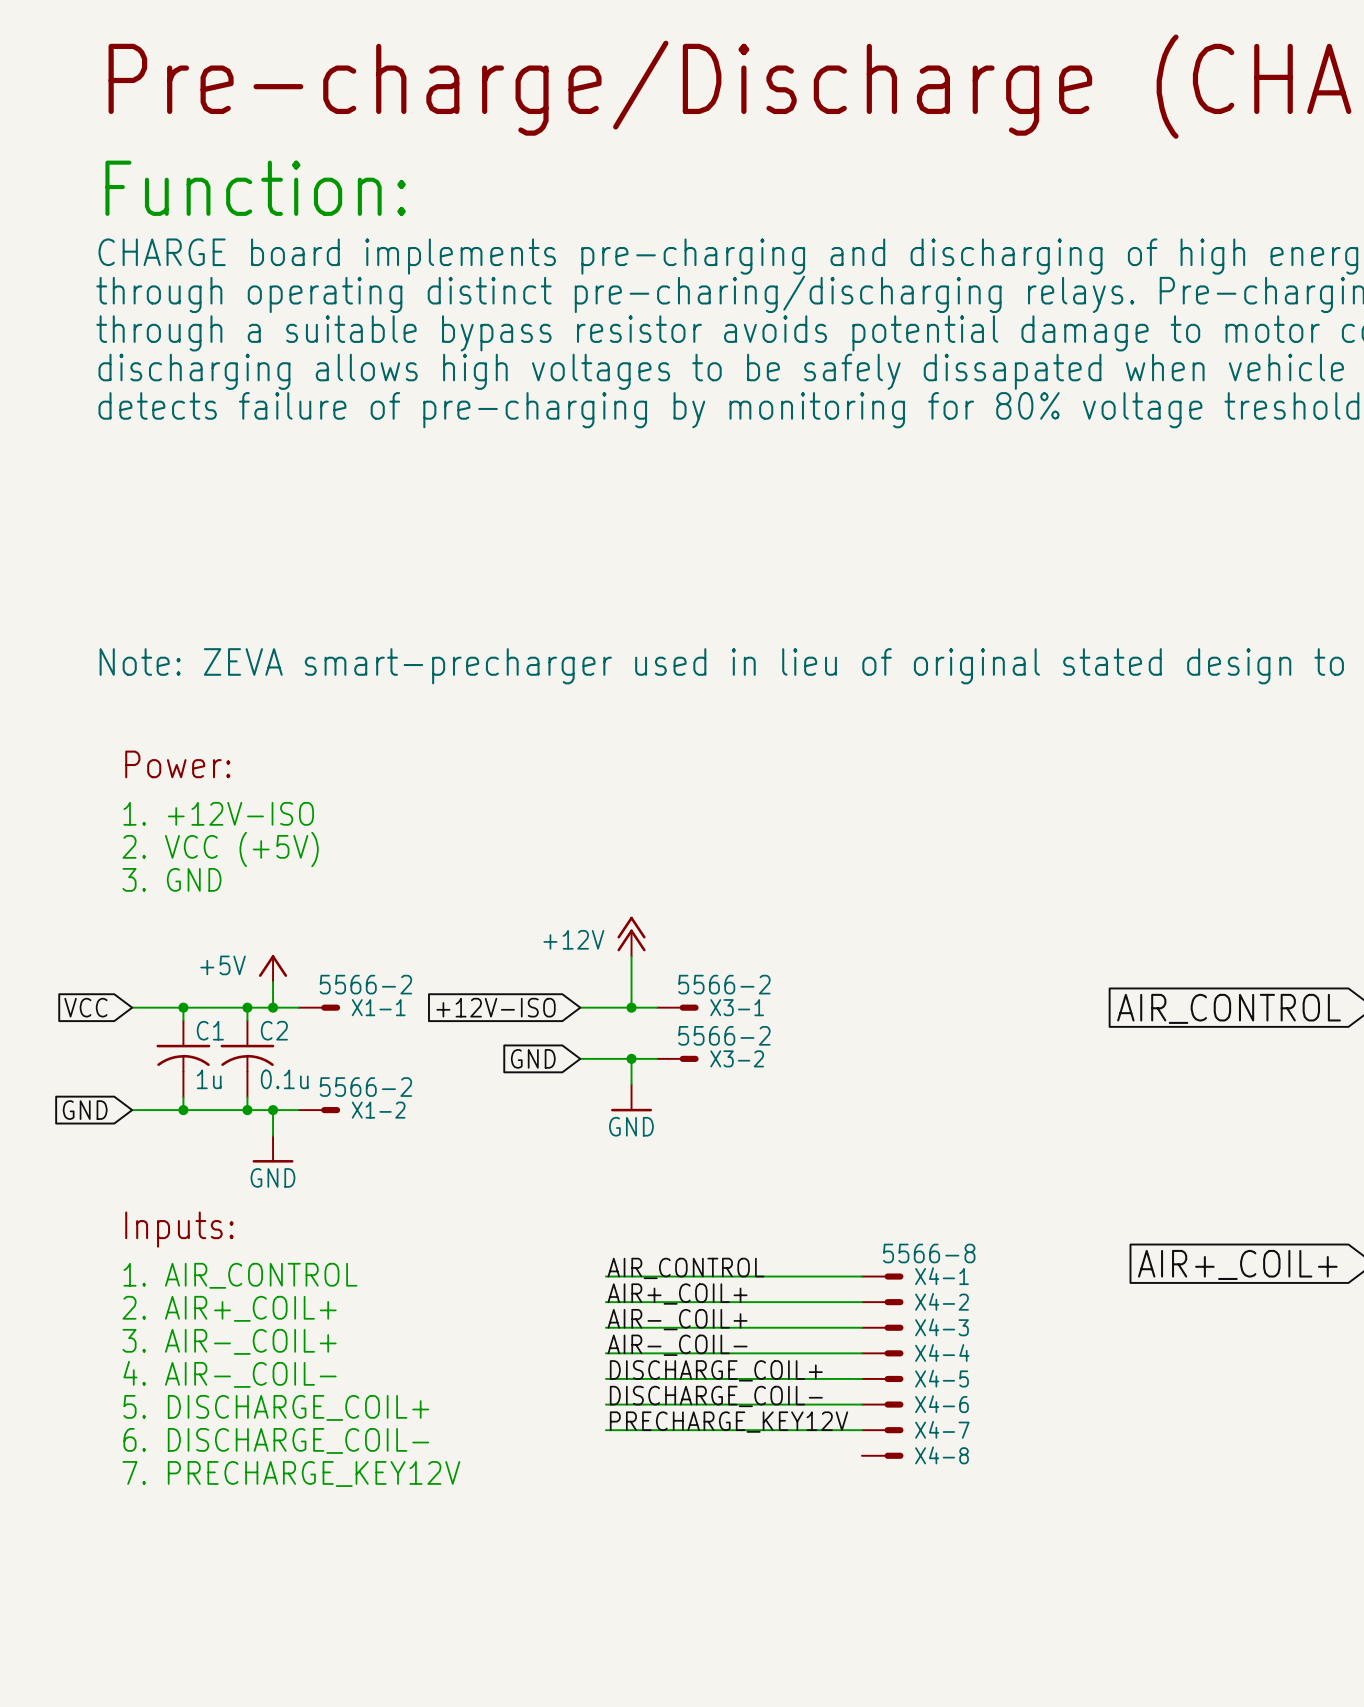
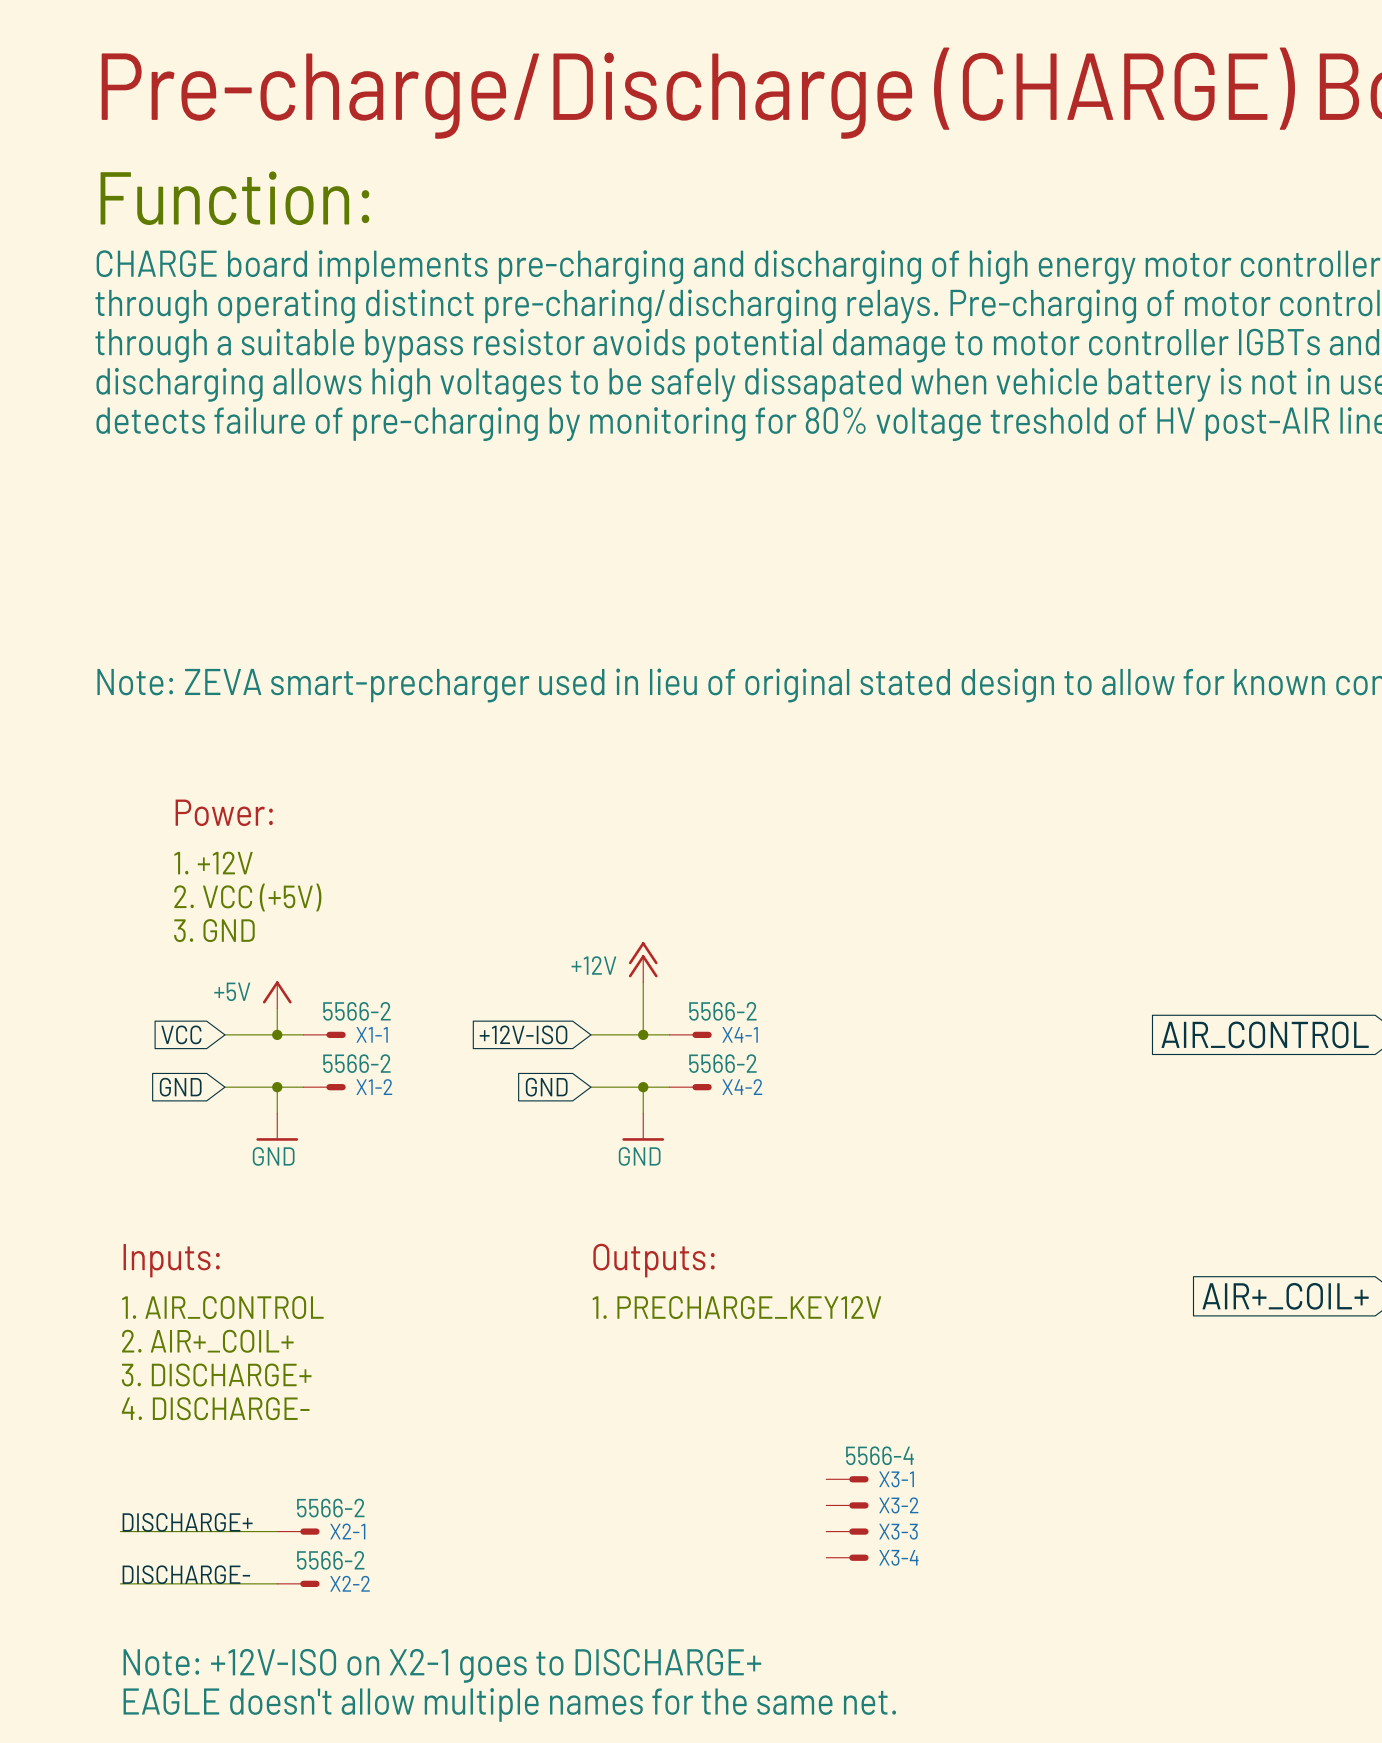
text position: Power: (177, 764) -> Power: (224, 812)
text: 1. +12V-ISO (218, 813) -> 1. +12V (213, 863)
text position: 2. VCC (+5V) (220, 849) -> 2. VCC (+5V) (247, 897)
text position: 3. GND (171, 879) -> 3. GND (214, 930)
global label position: VCC (85, 1007) -> VCC (181, 1034)
wire: (132, 1007) (221, 1007) -> none
wire: (183, 1007) (183, 1020) -> none
junction: (183, 1007) -> none
wire: (247, 1007) (247, 1020) -> none
junction: (247, 1007) -> none
X3-1 name: X3-1 (737, 1007) -> X4-1 (740, 1034)
C1: 1u (183, 1058) -> none
wire: none -> (224, 1087) (303, 1087)
C2: 0.1u (247, 1058) -> none
junction: none -> (277, 1087)
X3-2 name: X3-2 (737, 1058) -> X4-2 (742, 1087)
wire: (183, 1097) (183, 1110) -> none
wire: (247, 1097) (247, 1110) -> none
global label position: GND (85, 1110) -> GND (180, 1087)
wire: (132, 1110) (298, 1110) -> none
junction: (183, 1110) -> none
junction: (247, 1110) -> none
wire: (273, 1110) (273, 1135) -> (277, 1087) (277, 1113)
junction: (273, 1110) -> none
X1-2 position: (319, 1110) -> (324, 1087)
power symbol position: GND (273, 1149) -> GND (277, 1127)
text: none -> Outputs: (654, 1260)
label: AIR_CONTROL (685, 1268) -> none
text: none -> 1. PRECHARGE_KEY12V (736, 1307)
wire: (605, 1276) (861, 1276) -> none
X4-1: 5566-8 (882, 1276) -> none
label: AIR+_COIL+ (677, 1294) -> none
wire: (605, 1302) (861, 1302) -> none
X4-2: (882, 1302) -> none
label: AIR-_COIL+ (677, 1319) -> none
wire: (605, 1327) (861, 1327) -> none
X4-3: (882, 1327) -> none
text: 3. AIR-_COIL+ (229, 1341) -> 3. DISCHARGE+ (216, 1375)
label: AIR-_COIL- (677, 1345) -> none
wire: (605, 1353) (861, 1353) -> none
X4-4: (882, 1353) -> none
label: DISCHARGE_COIL+ (716, 1370) -> none
text: 4. AIR-_COIL- (230, 1374) -> 4. DISCHARGE- (215, 1408)
wire: (605, 1378) (861, 1378) -> none
X4-5: (882, 1378) -> none
label: DISCHARGE_COIL- (716, 1396) -> none
wire: (605, 1404) (861, 1404) -> none
X4-6: (882, 1404) -> none
text: 5. DISCHARGE_COIL+ (276, 1407) -> none
label: PRECHARGE_KEY12V (729, 1422) -> none
wire: (605, 1430) (861, 1430) -> none
X4-7: (882, 1430) -> none
text: 6. DISCHARGE_COIL- (276, 1440) -> none
X3-1: none -> 5566-4 (847, 1479)
X4-8: (882, 1455) -> none
X3-2: none -> (847, 1505)
text: 7. PRECHARGE_KEY12V (291, 1473) -> none
label: none -> DISCHARGE+ (187, 1522)
wire: none -> (120, 1531) (277, 1531)
X2-1: none -> 5566-2 (298, 1531)
X3-3: none -> (847, 1531)
X3-4: none -> (847, 1557)
label: none -> DISCHARGE- (186, 1574)
wire: none -> (120, 1583) (277, 1583)
X2-2: none -> 5566-2 (298, 1583)
text: none -> Note: +12V-ISO on X2-1 goes to DISCHARGE+ (442, 1665)
text: none -> EAGLE doesn't allow multiple names for the same net. (509, 1704)

